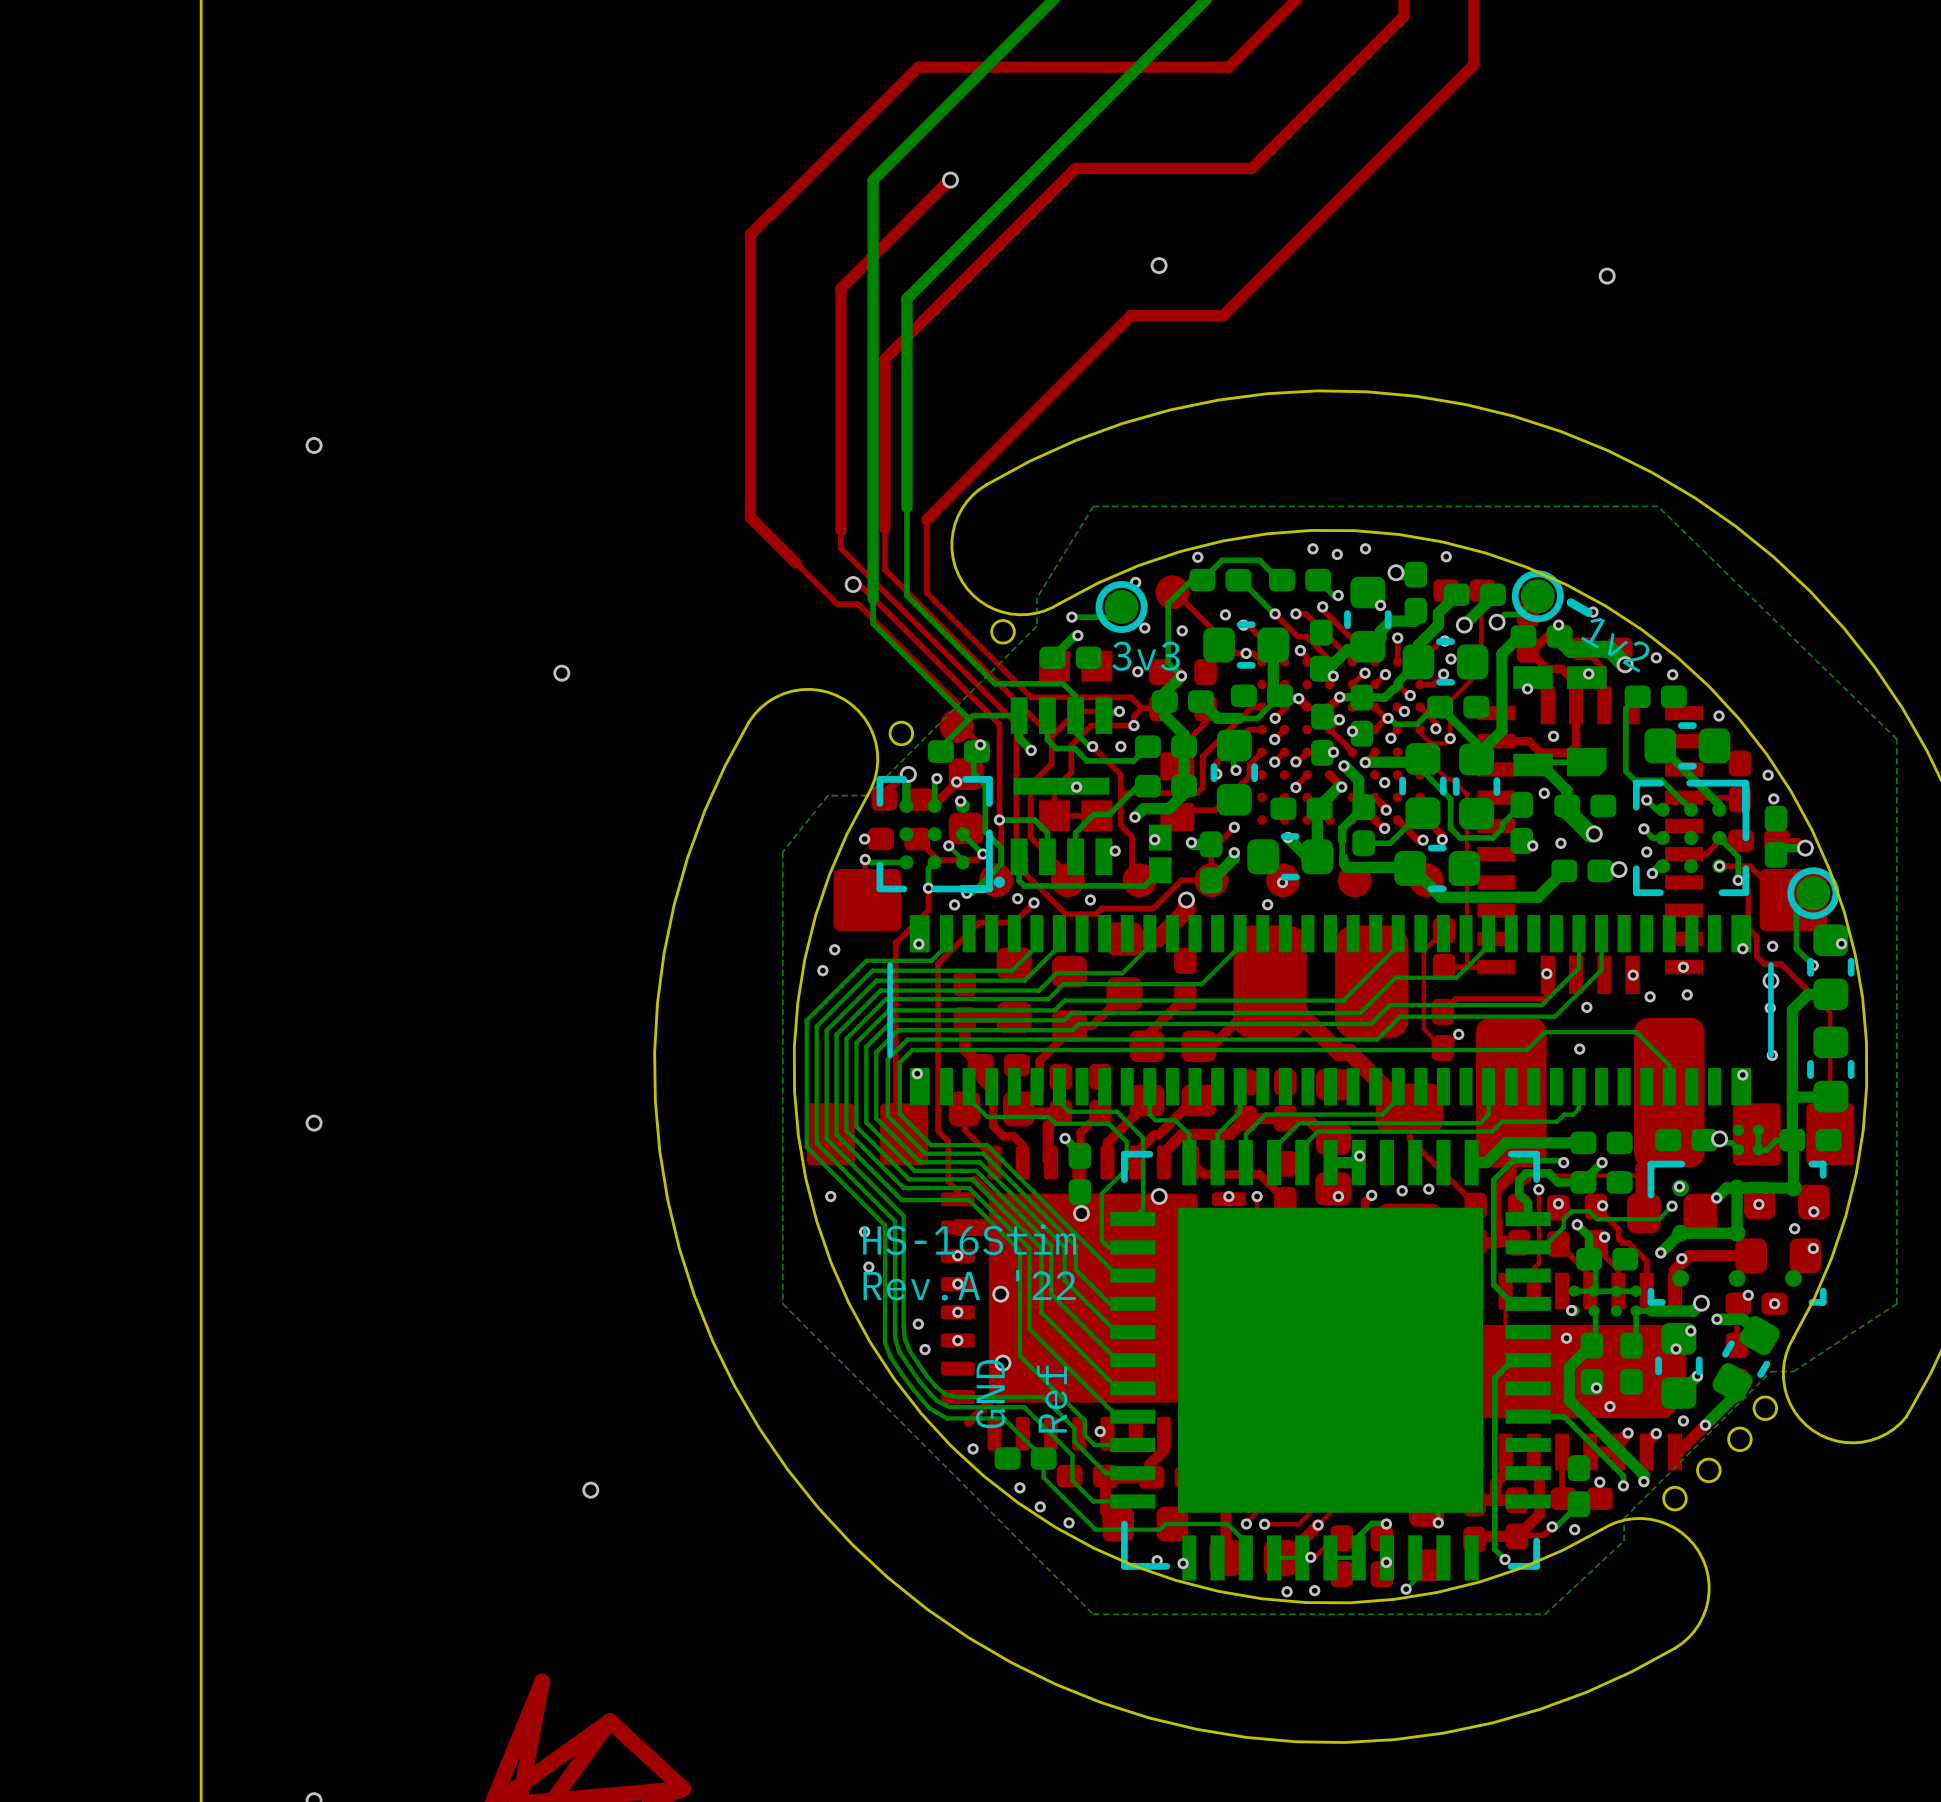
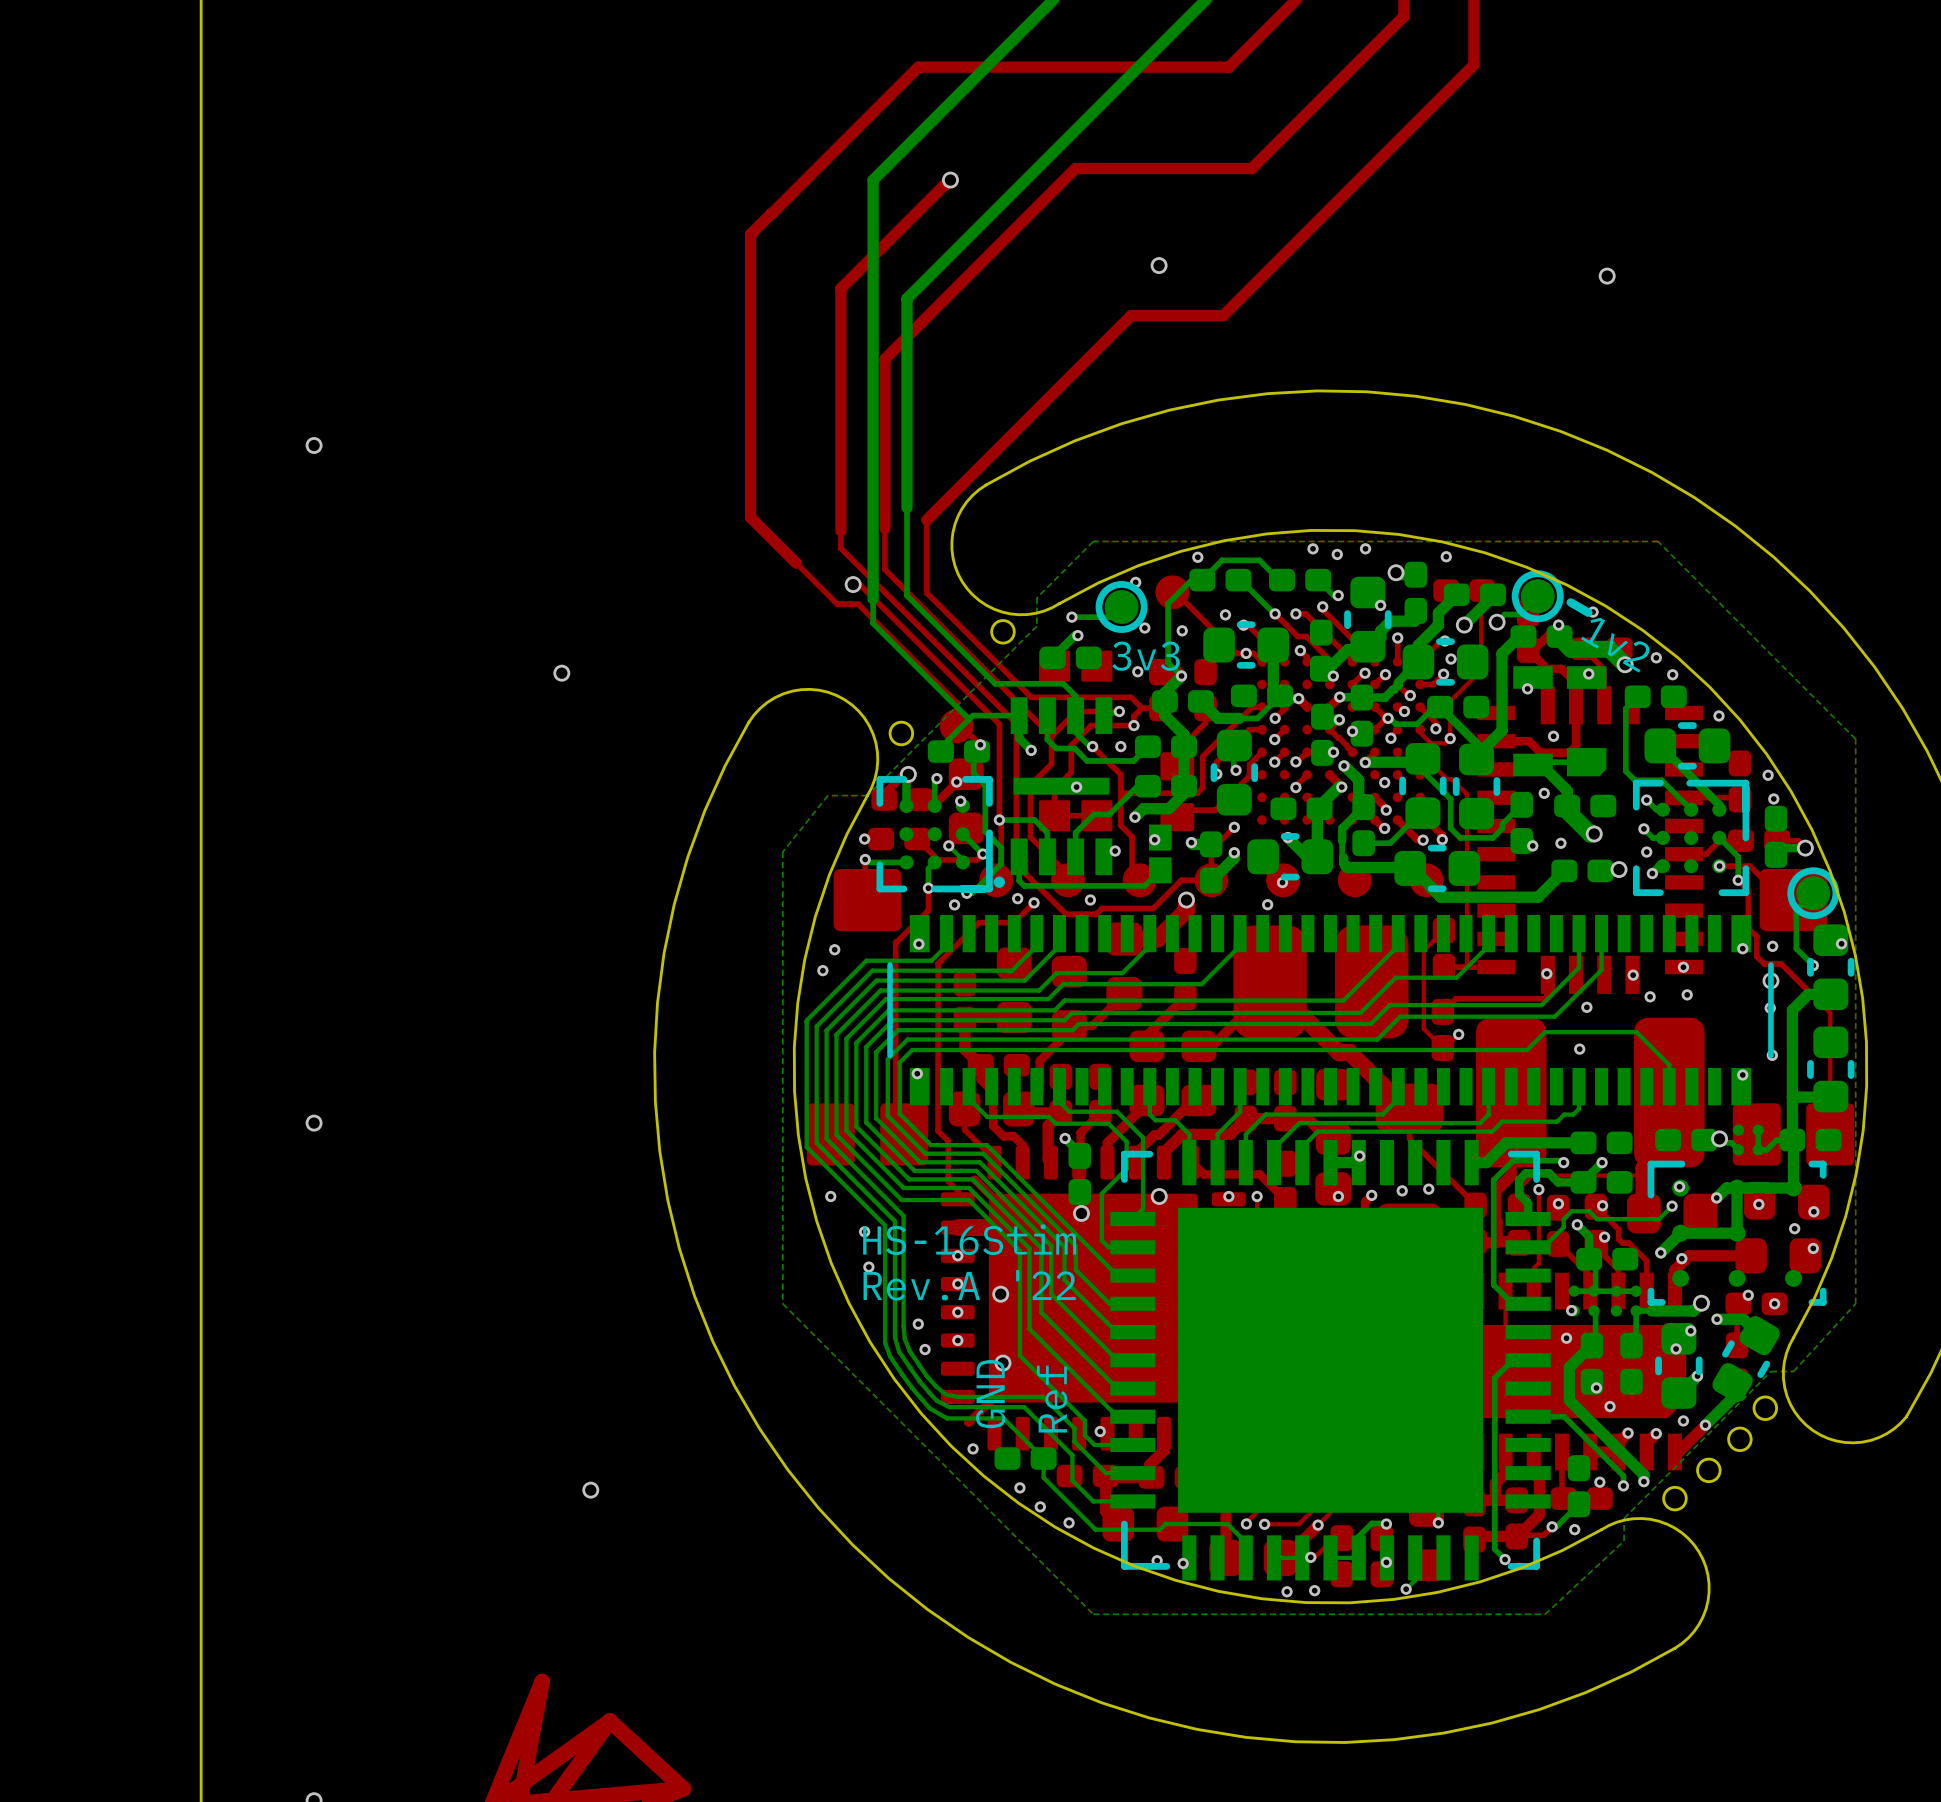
bottom zone outline: (1036, 597) (1093, 506) (1658, 506) (1896, 739) (1896, 1303) (1793, 1371) -> (1036, 597) (1093, 541) (1658, 541) (1855, 739) (1855, 1303) (1793, 1371)

